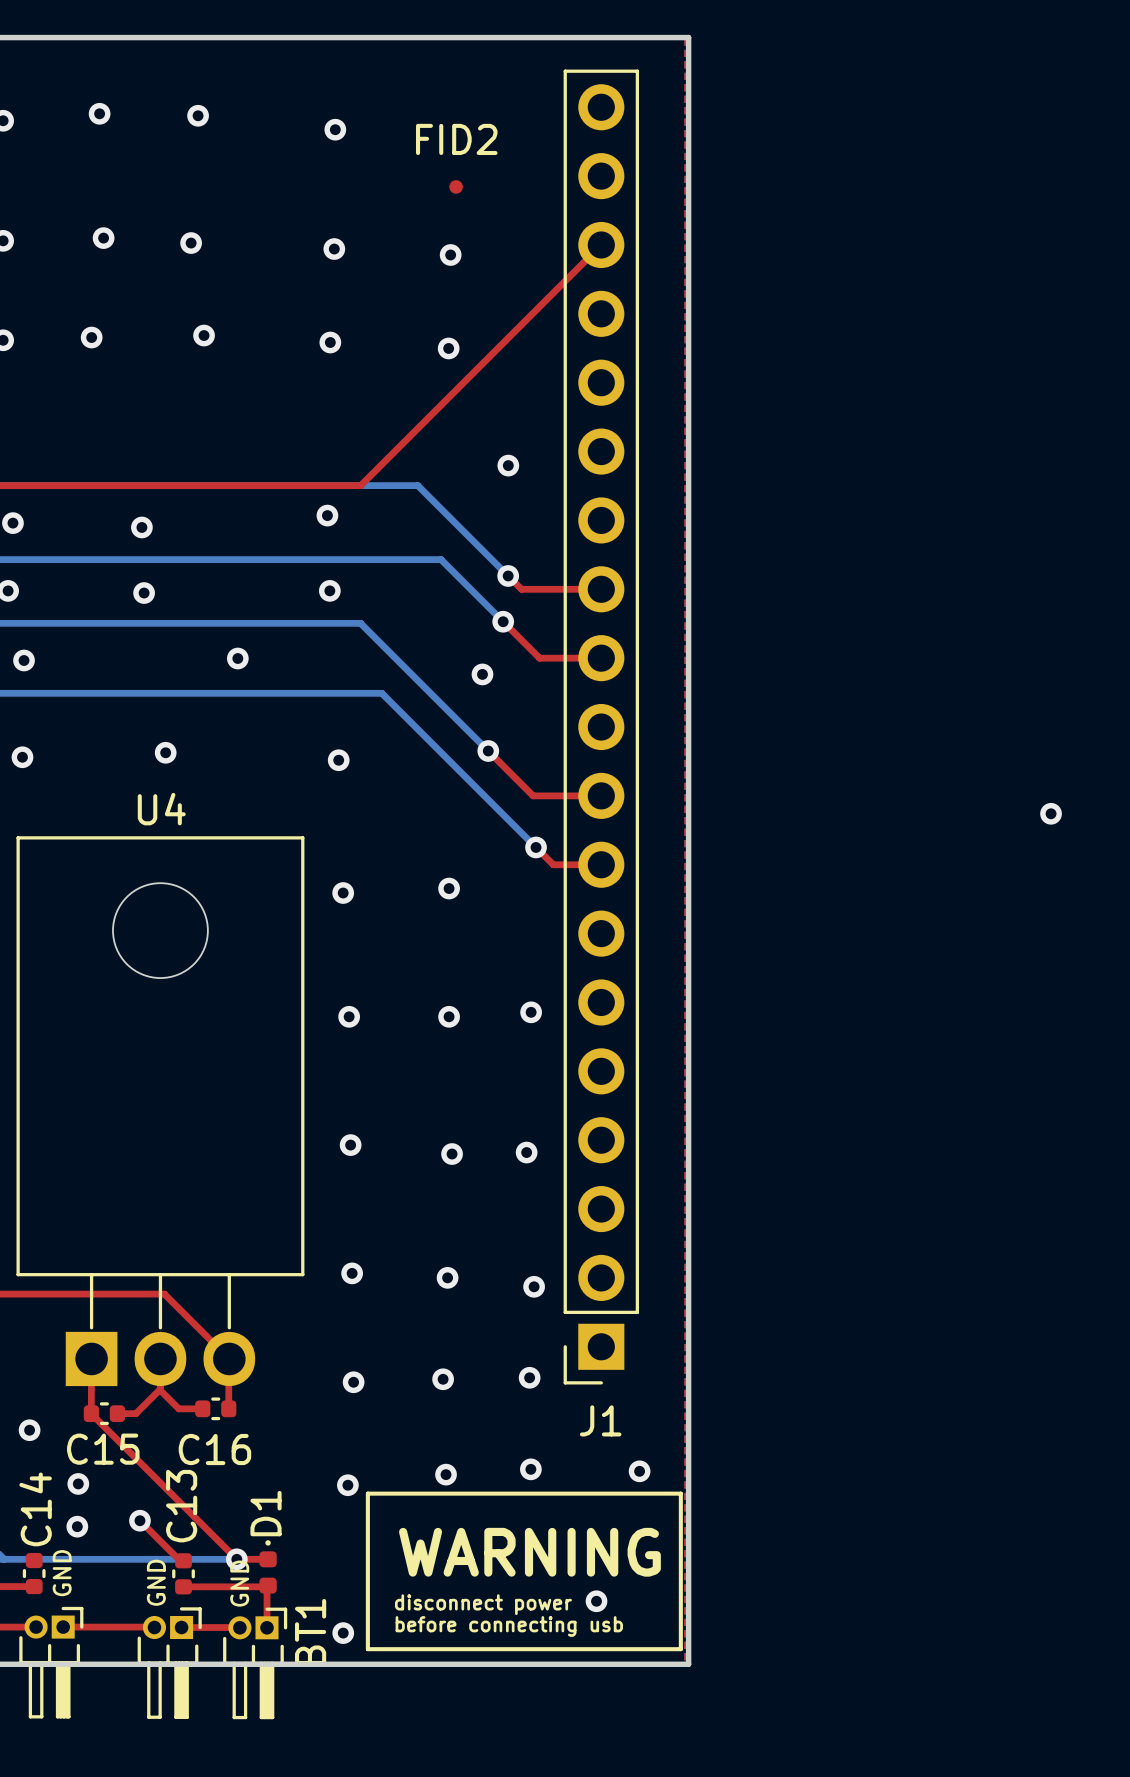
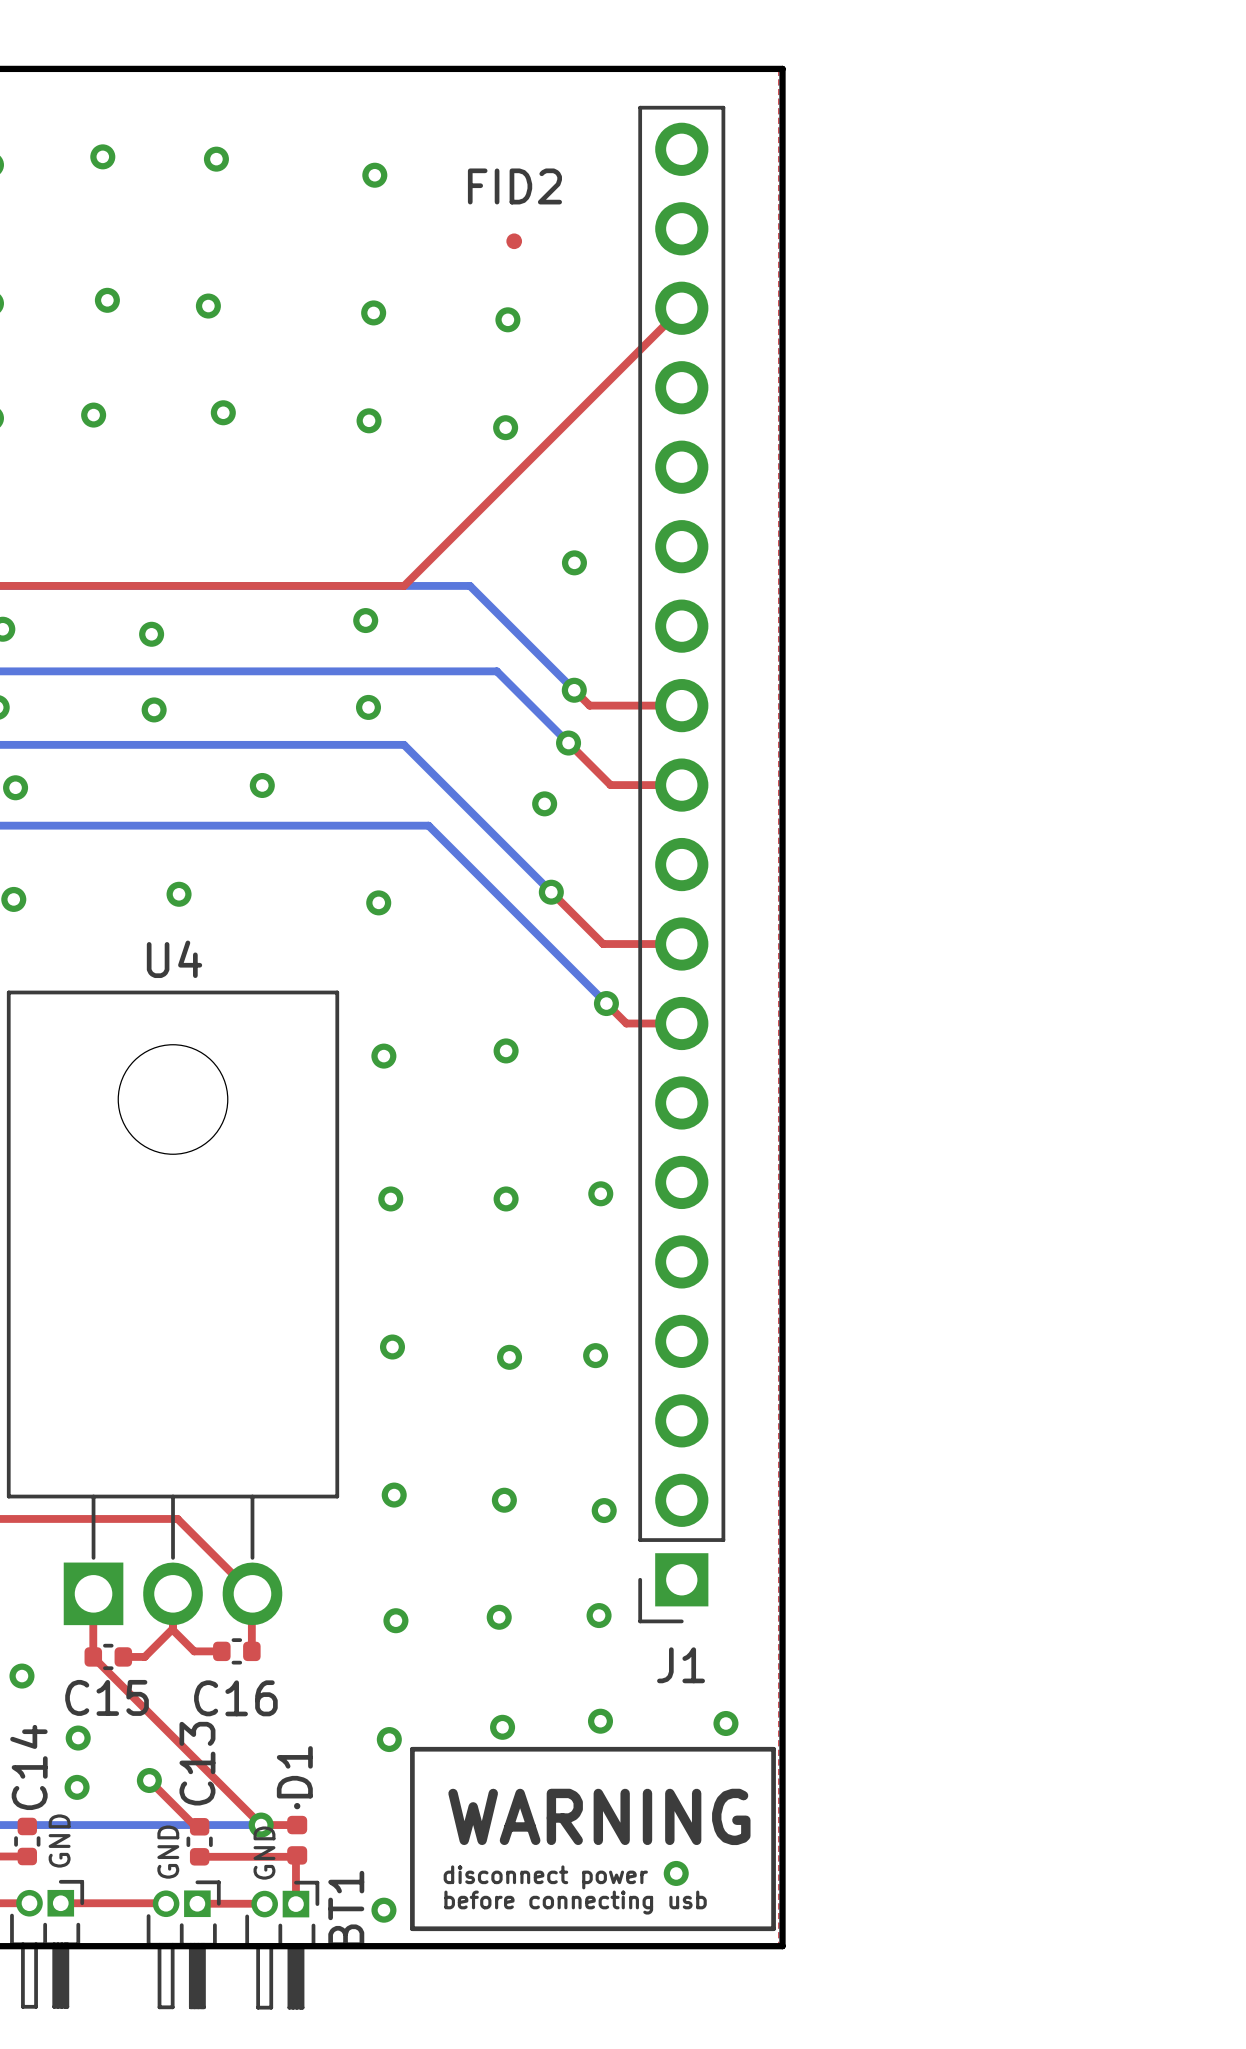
via: (1051, 813) -> none

